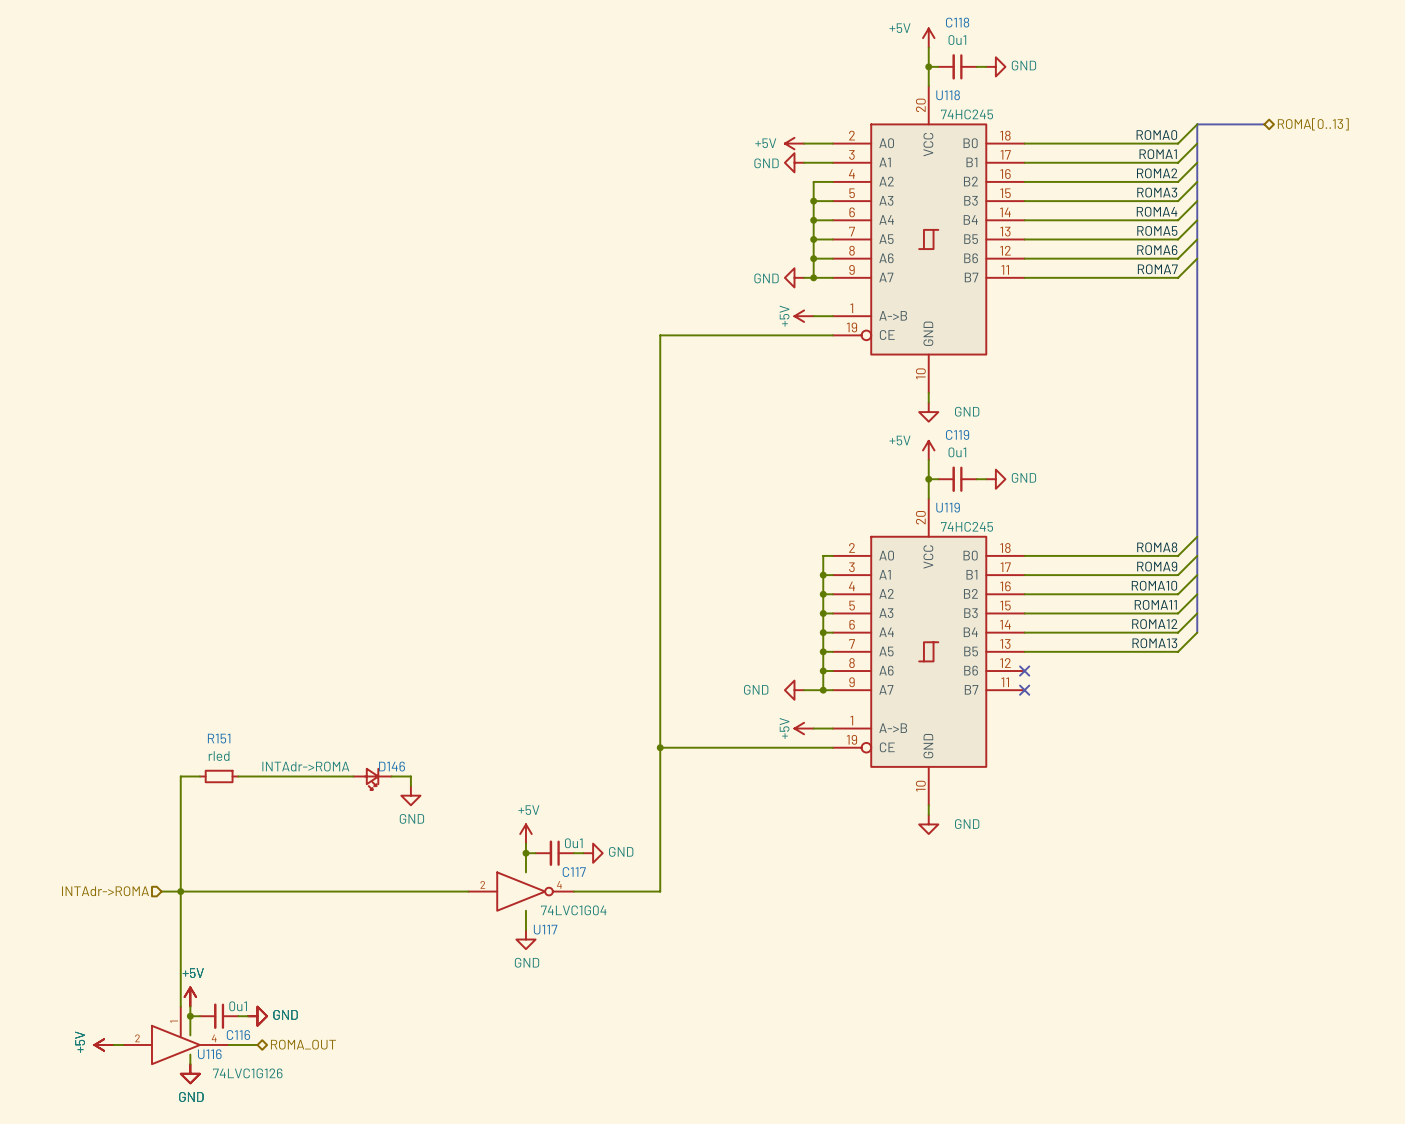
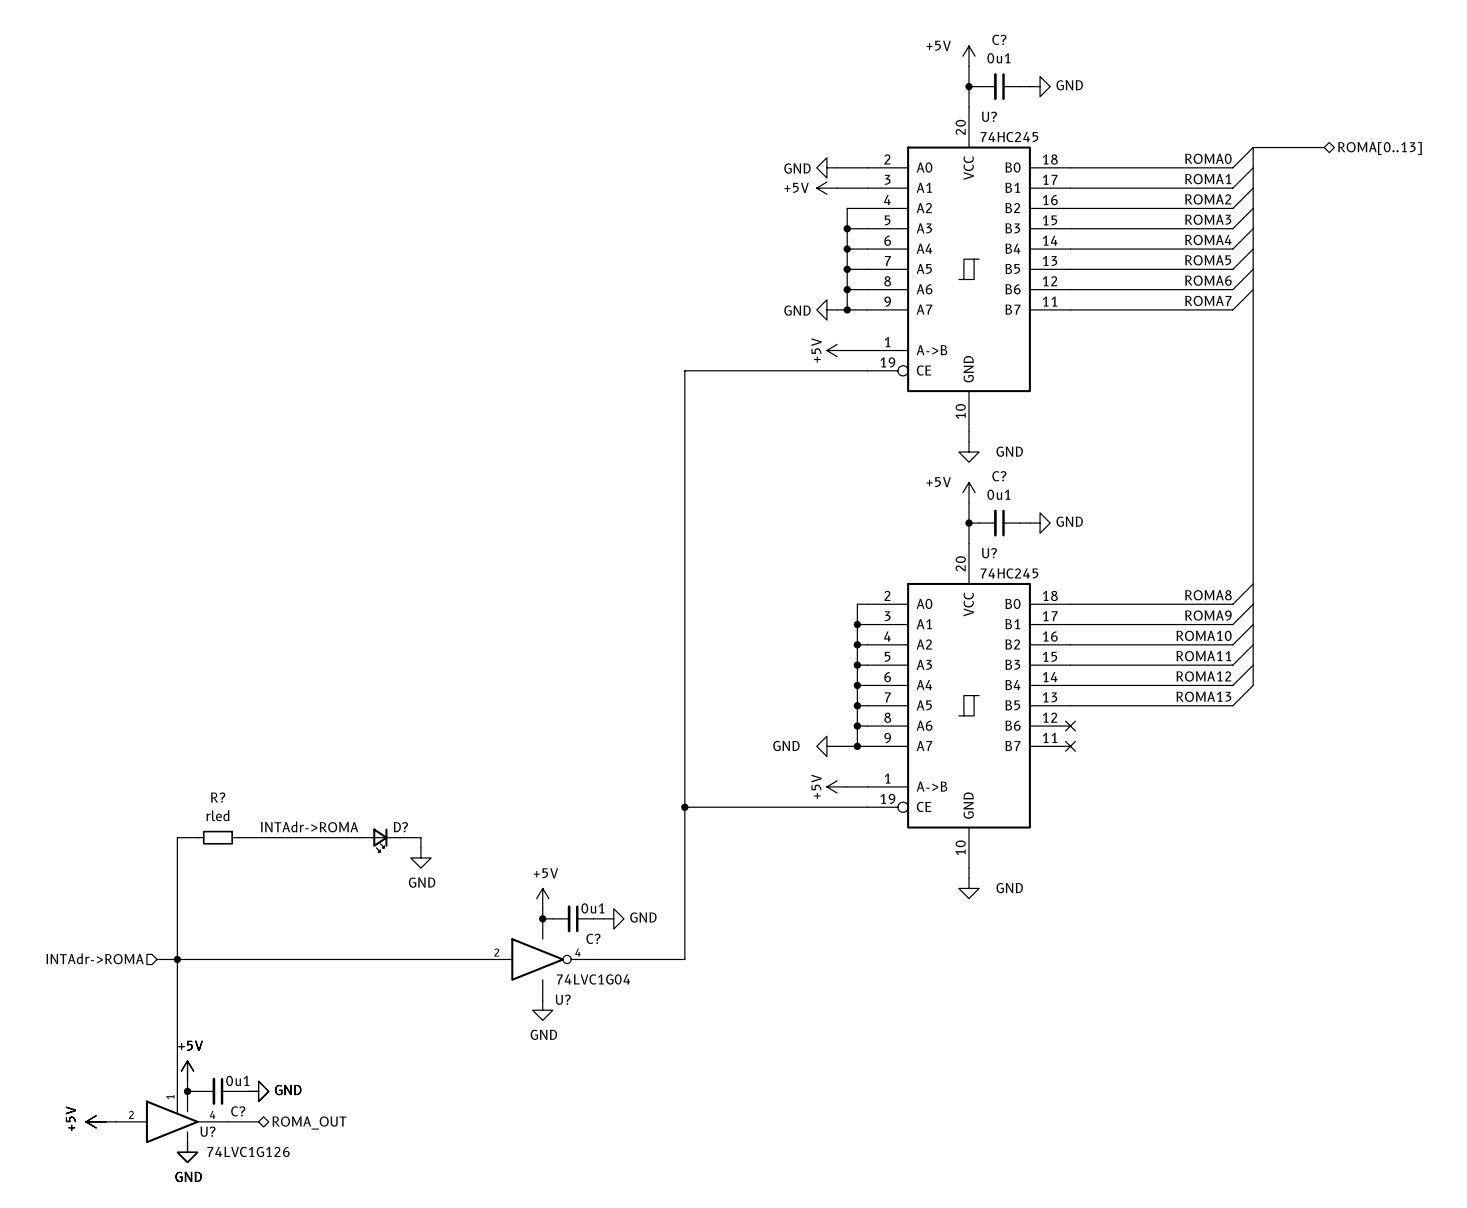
C118 name: C118 (957, 22) -> C? (999, 39)
U118 name: U118 (948, 95) -> U? (989, 116)
power symbol: +5V (794, 143) -> GND (826, 167)
power symbol: GND (794, 162) -> +5V (826, 188)
C119 name: C119 (957, 434) -> C? (999, 476)
U119 name: U119 (948, 507) -> U? (989, 553)
R151 name: R151 (219, 738) -> R? (218, 797)
D146 name: D146 (392, 766) -> D? (400, 827)
C117 name: C117 (574, 872) -> C? (593, 938)
U117 name: U117 (545, 929) -> U? (563, 999)
C116 name: C116 (238, 1035) -> C? (238, 1111)
U116 name: U116 (209, 1054) -> U? (207, 1131)

